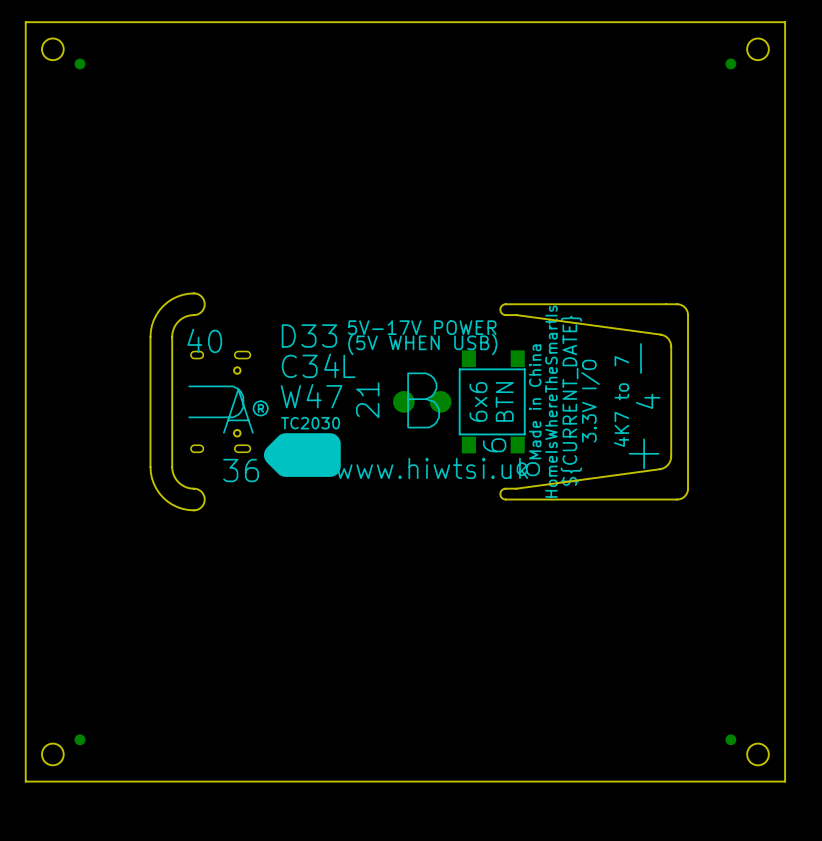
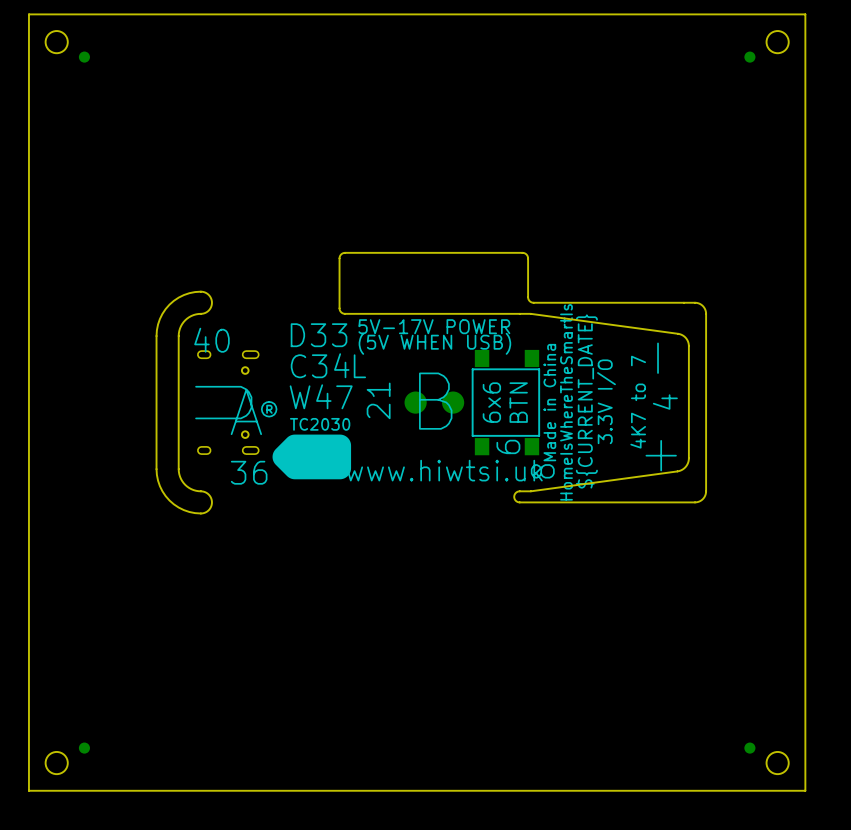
board edge: (519, 304) (502, 305) (500, 311) (505, 315) -> (533, 302) (528, 297) (528, 257) (523, 253) (345, 252) (339, 256) (339, 309) (343, 313) (519, 313)

